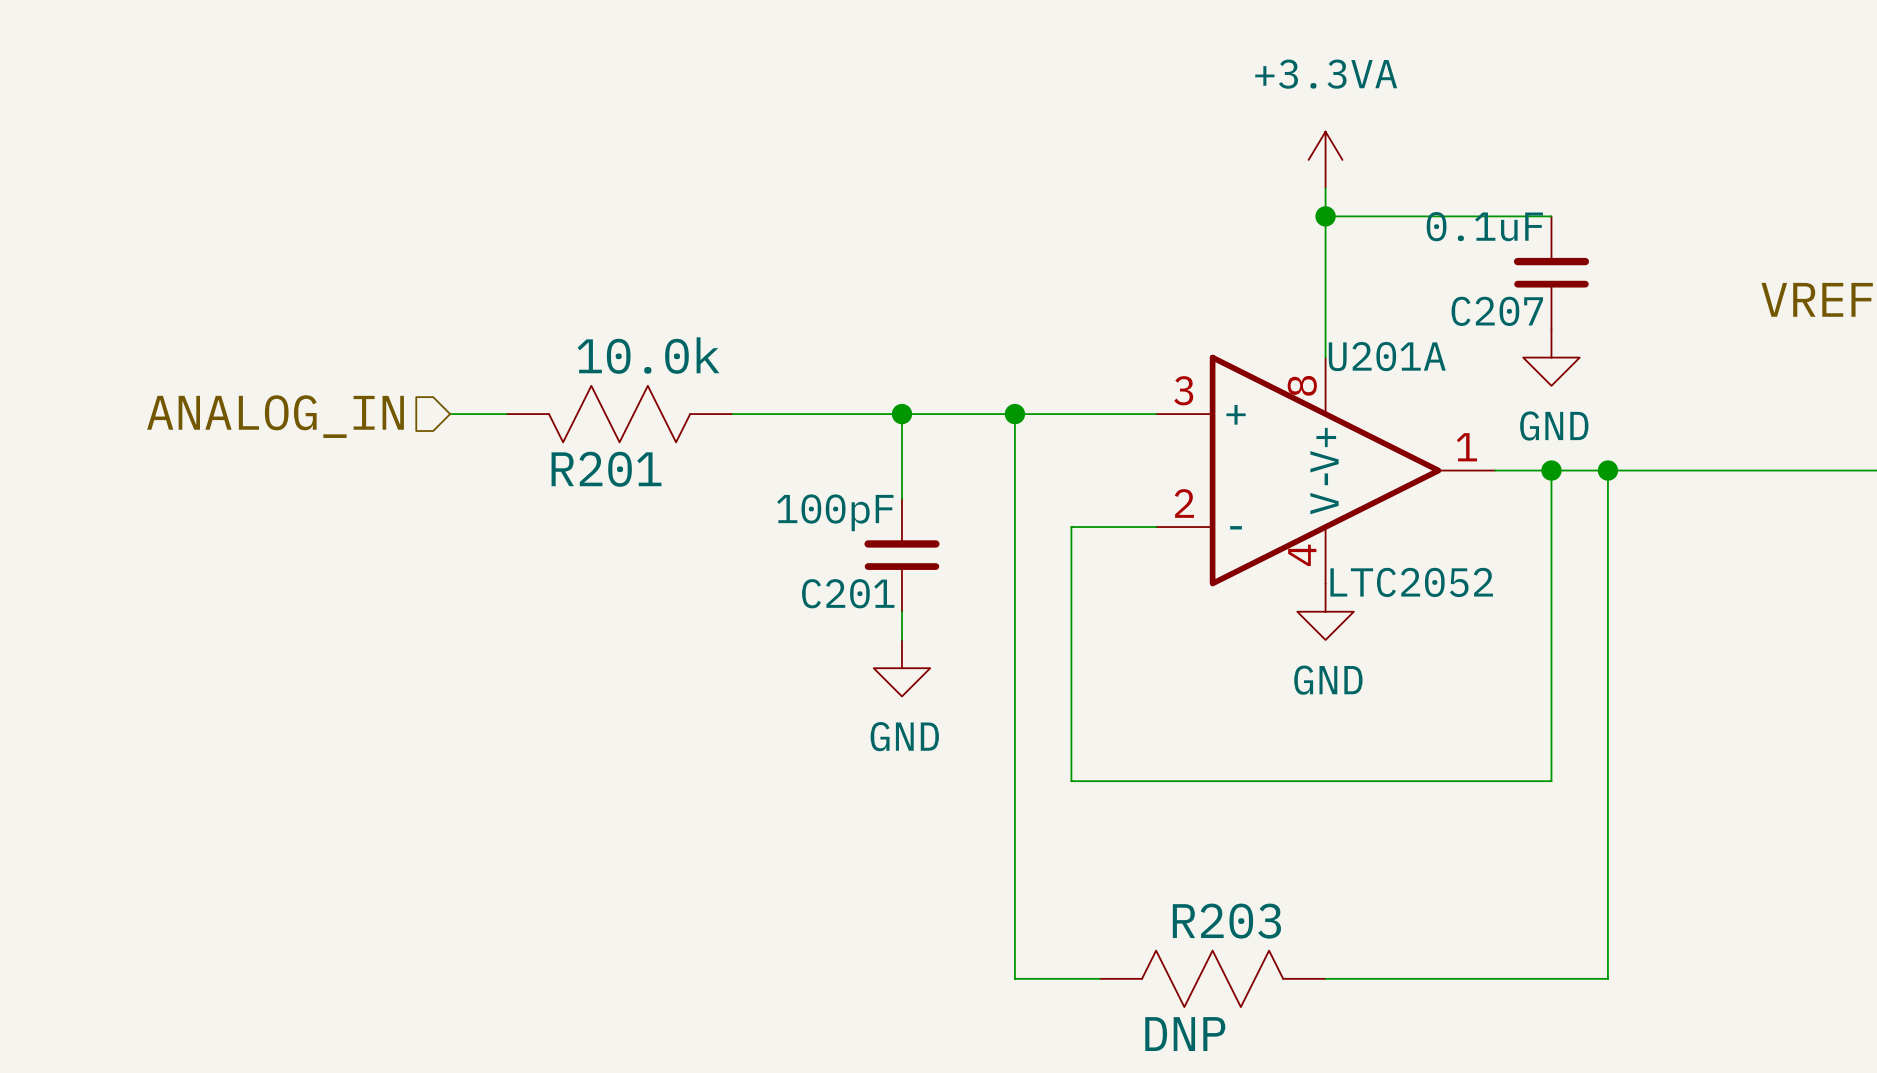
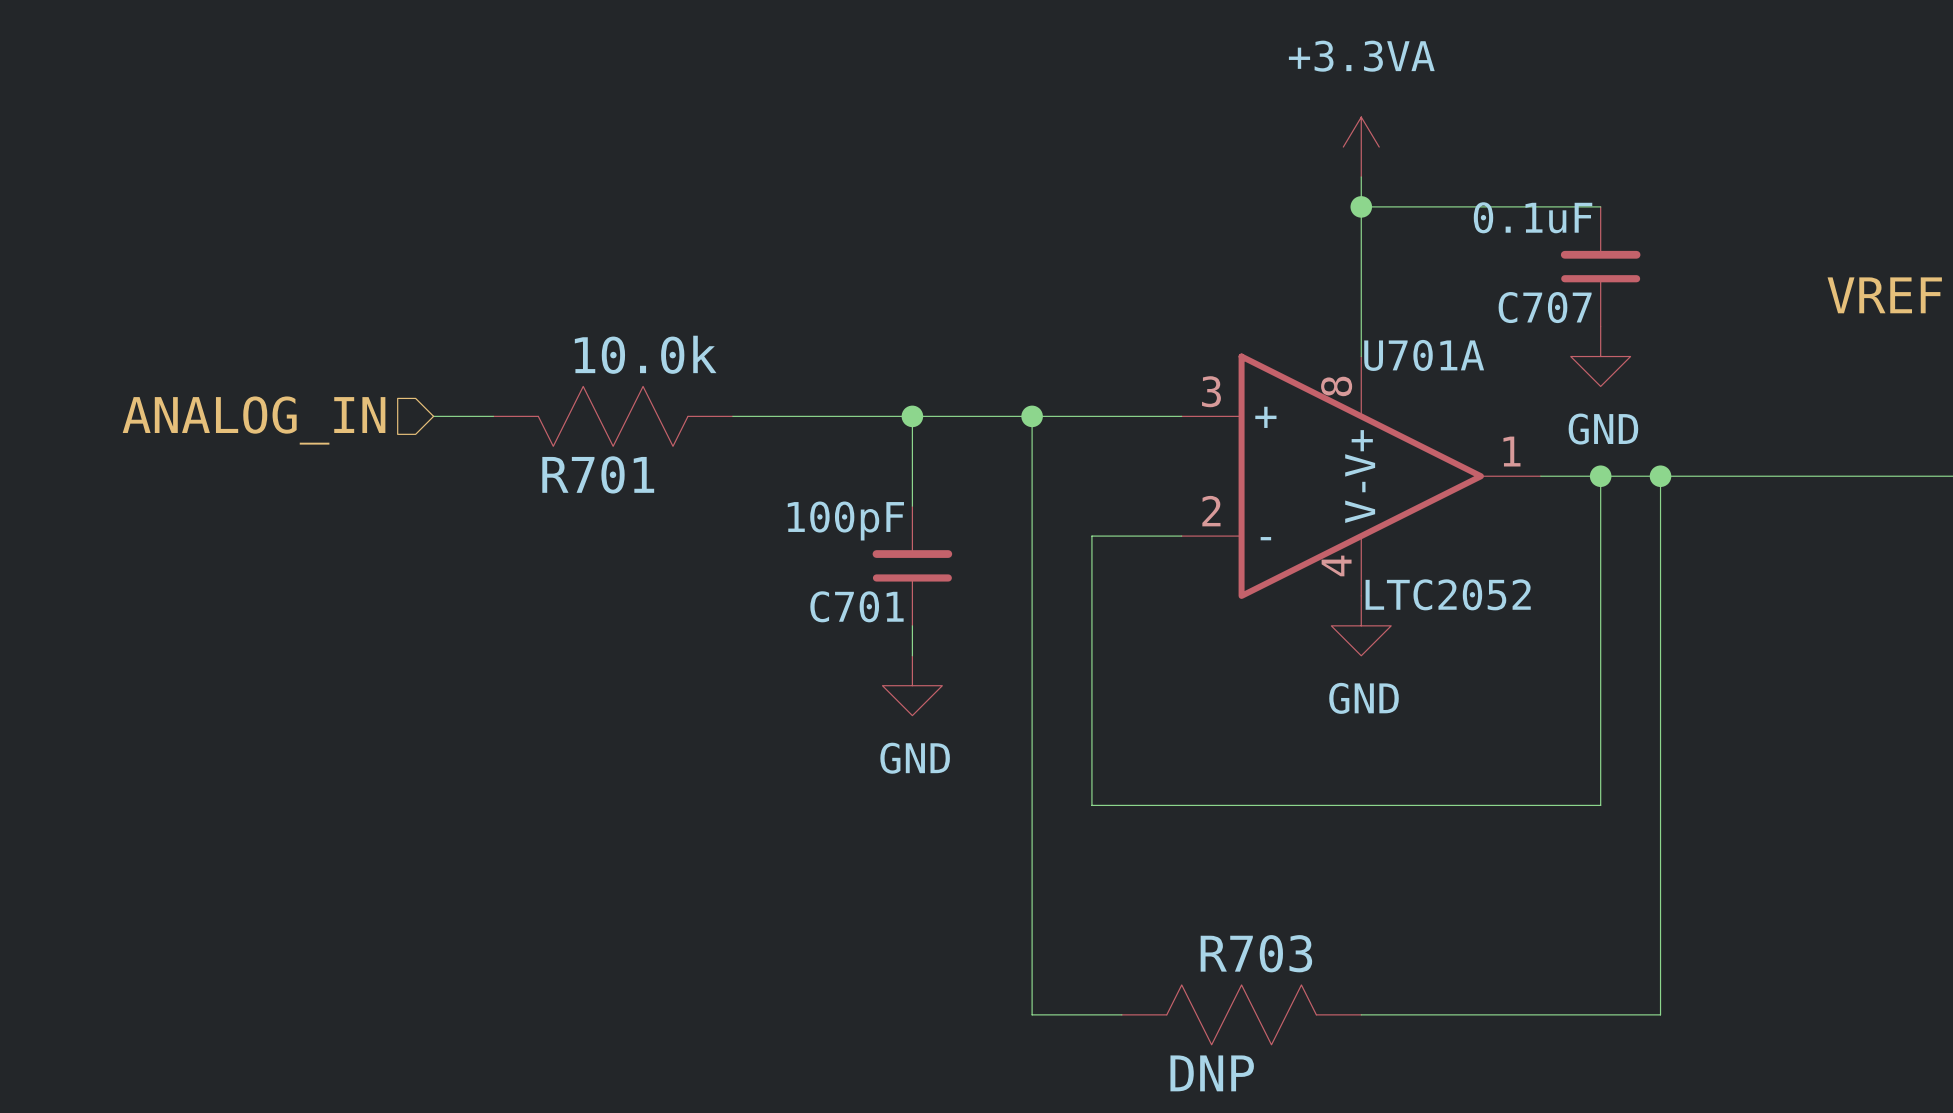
C207 name: C207 (1497, 311) -> C707 (1545, 307)
U201A name: U201A (1387, 356) -> U701A (1424, 355)
R201 name: R201 (606, 469) -> R701 (598, 474)
C201 name: C201 (848, 593) -> C701 (856, 606)
R203 name: R203 (1226, 921) -> R703 (1256, 953)

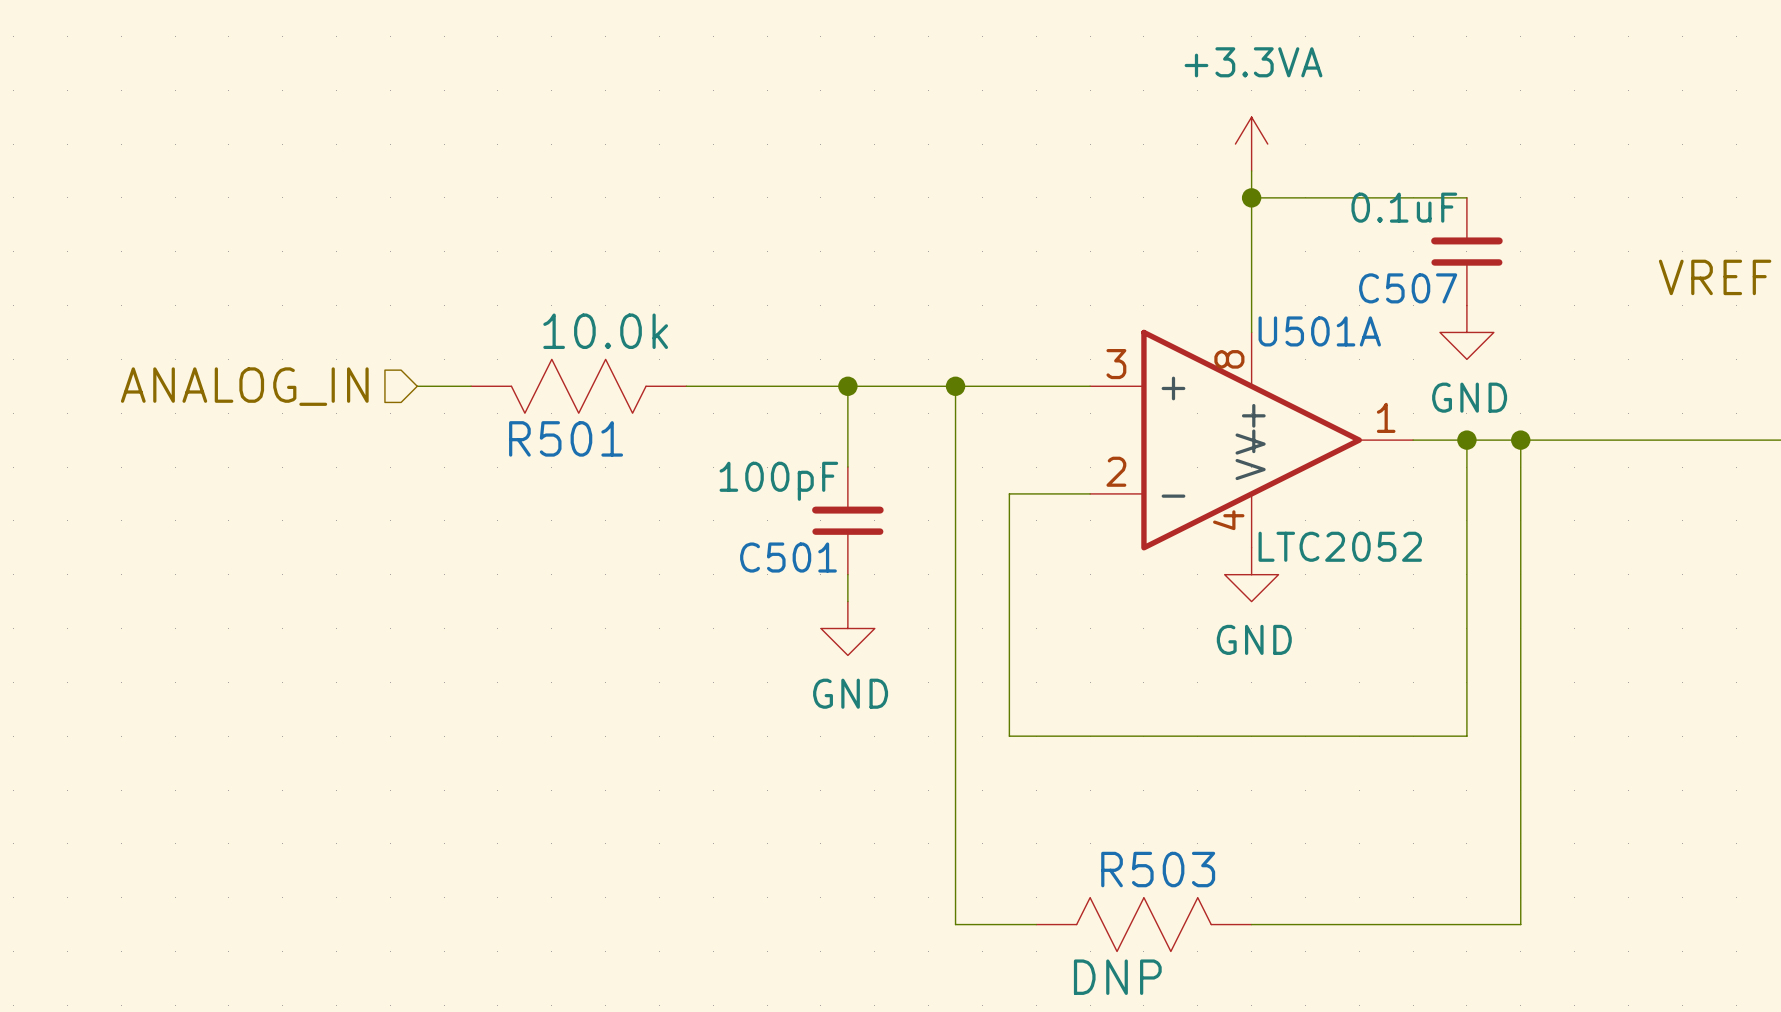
C707 name: C707 (1545, 307) -> C507 (1408, 288)
U701A name: U701A (1424, 355) -> U501A (1319, 331)
R701 name: R701 (598, 474) -> R501 (566, 438)
C701 name: C701 (856, 606) -> C501 (788, 557)
R703 name: R703 (1256, 953) -> R503 (1158, 869)

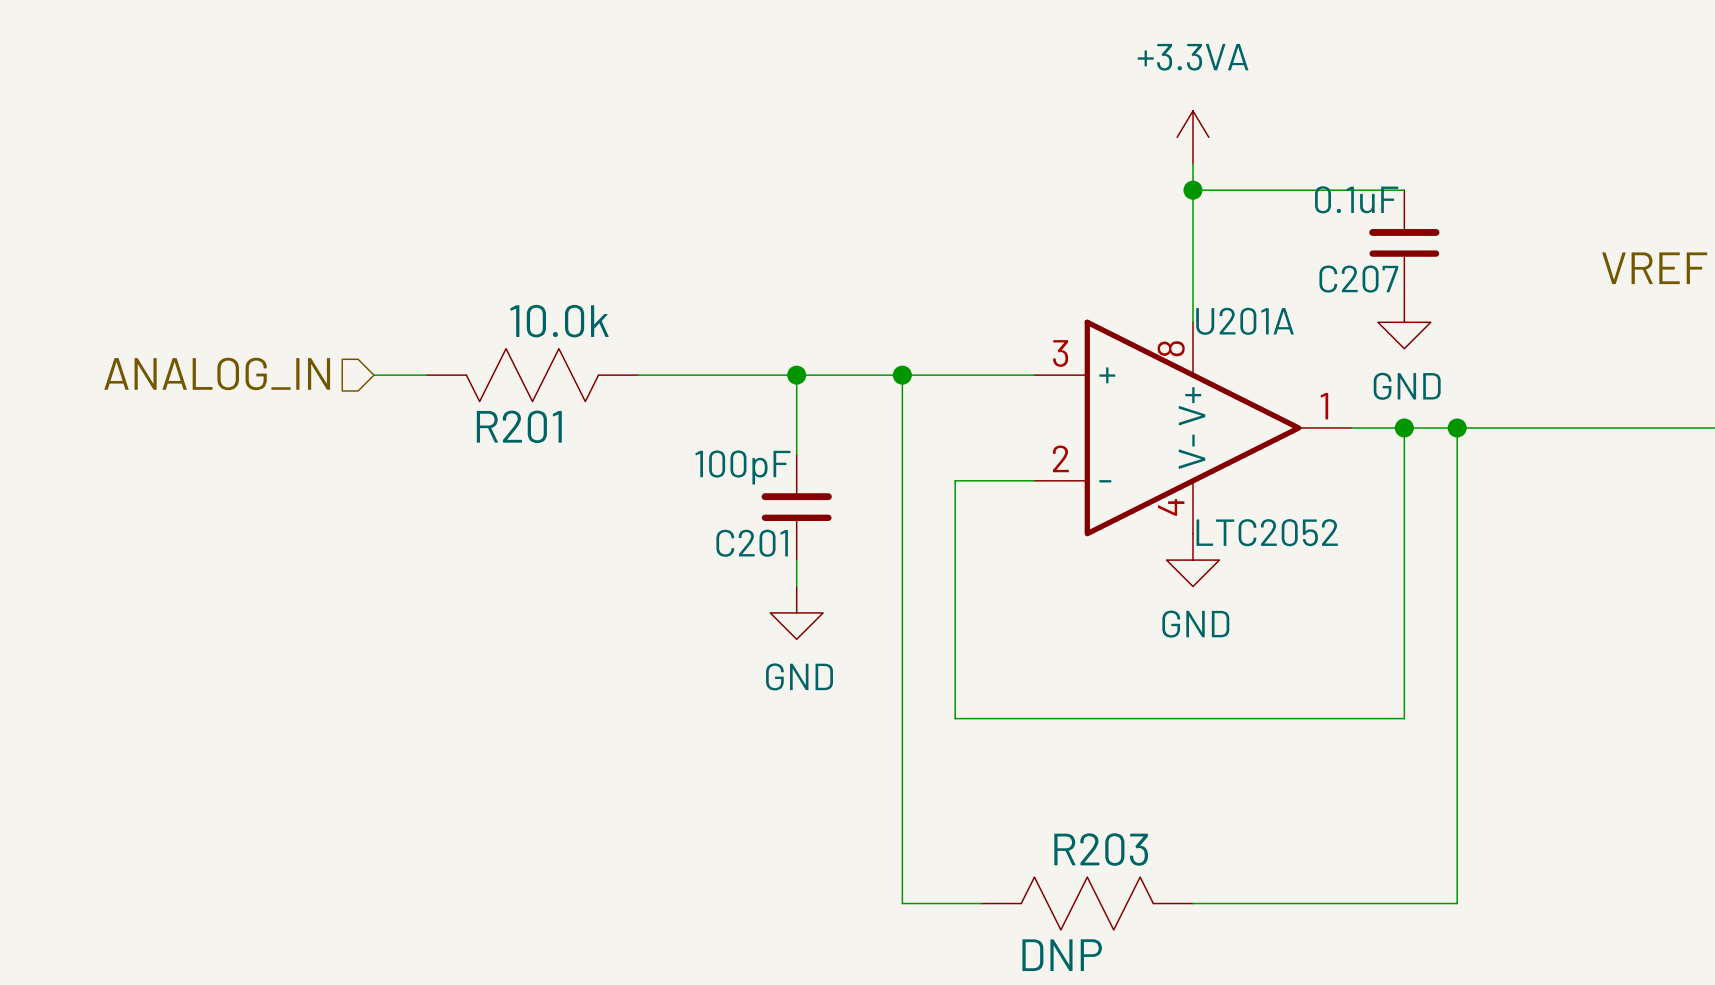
C507 name: C507 (1408, 288) -> C207 (1358, 279)
U501A name: U501A (1319, 331) -> U201A (1245, 321)
R501 name: R501 (566, 438) -> R201 (519, 426)
C501 name: C501 (788, 557) -> C201 (752, 543)
R503 name: R503 (1158, 869) -> R203 (1101, 849)

